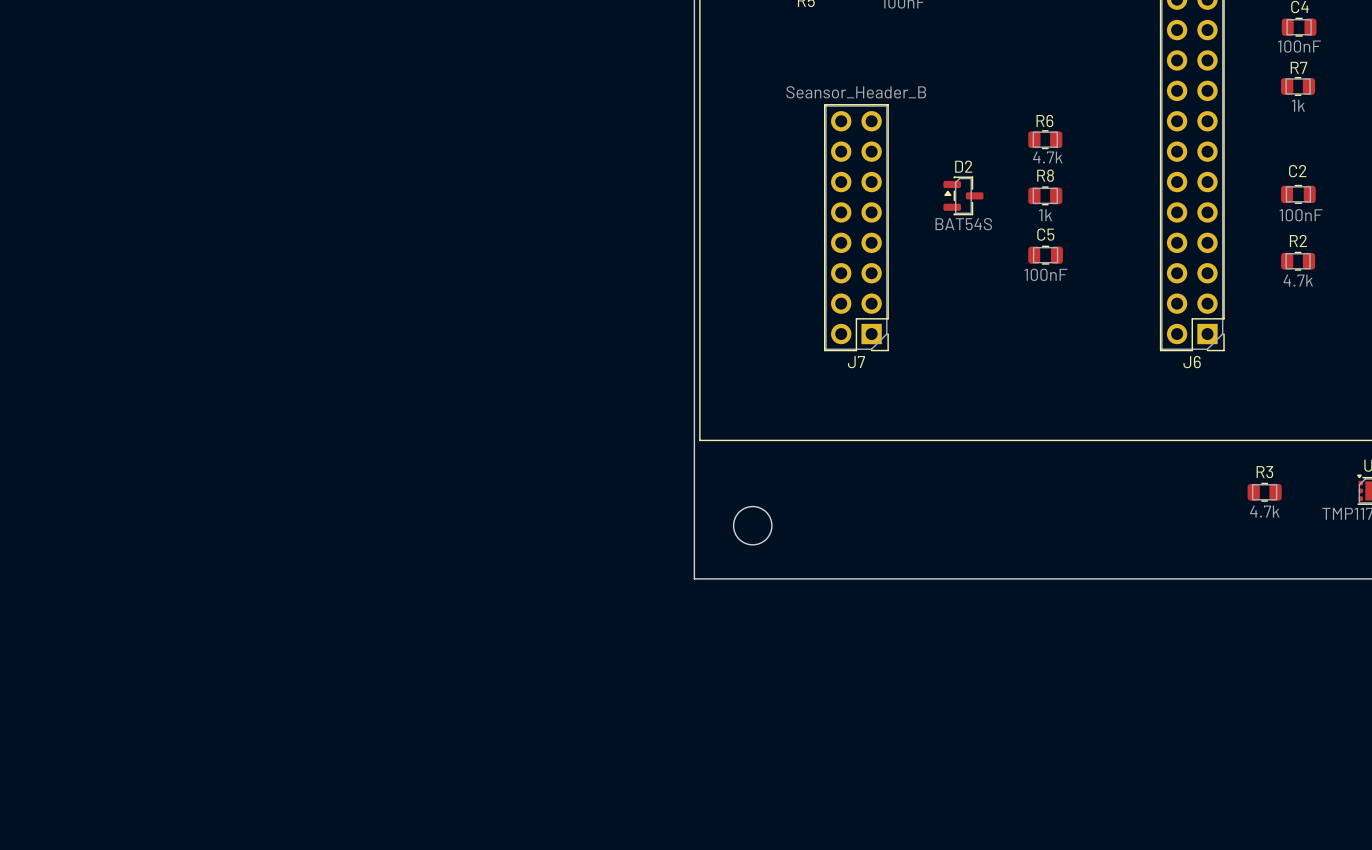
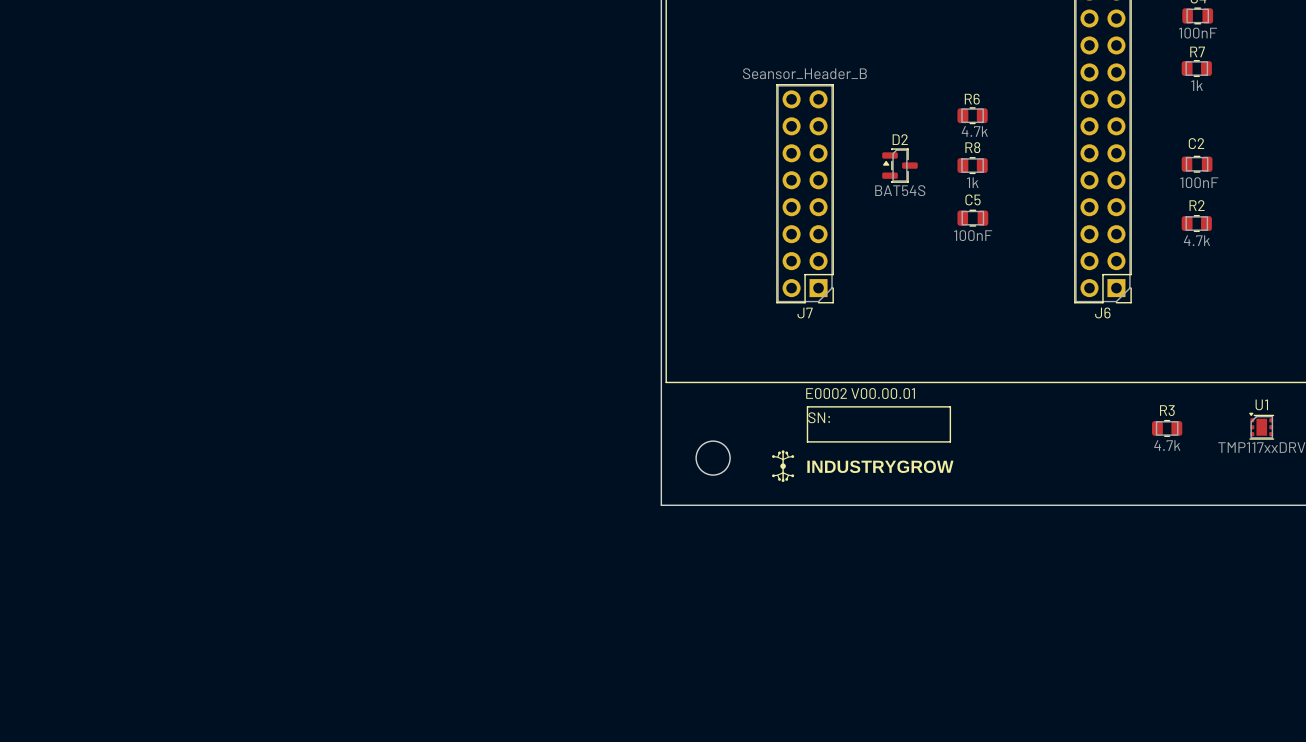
text: none -> E0002 V00.00.01 (860, 393)
line: none -> (807, 406) (950, 406) (950, 441) (807, 441) (807, 406)
text: none -> SN: (819, 417)
drawing: none -> [772, 450, 954, 483]

